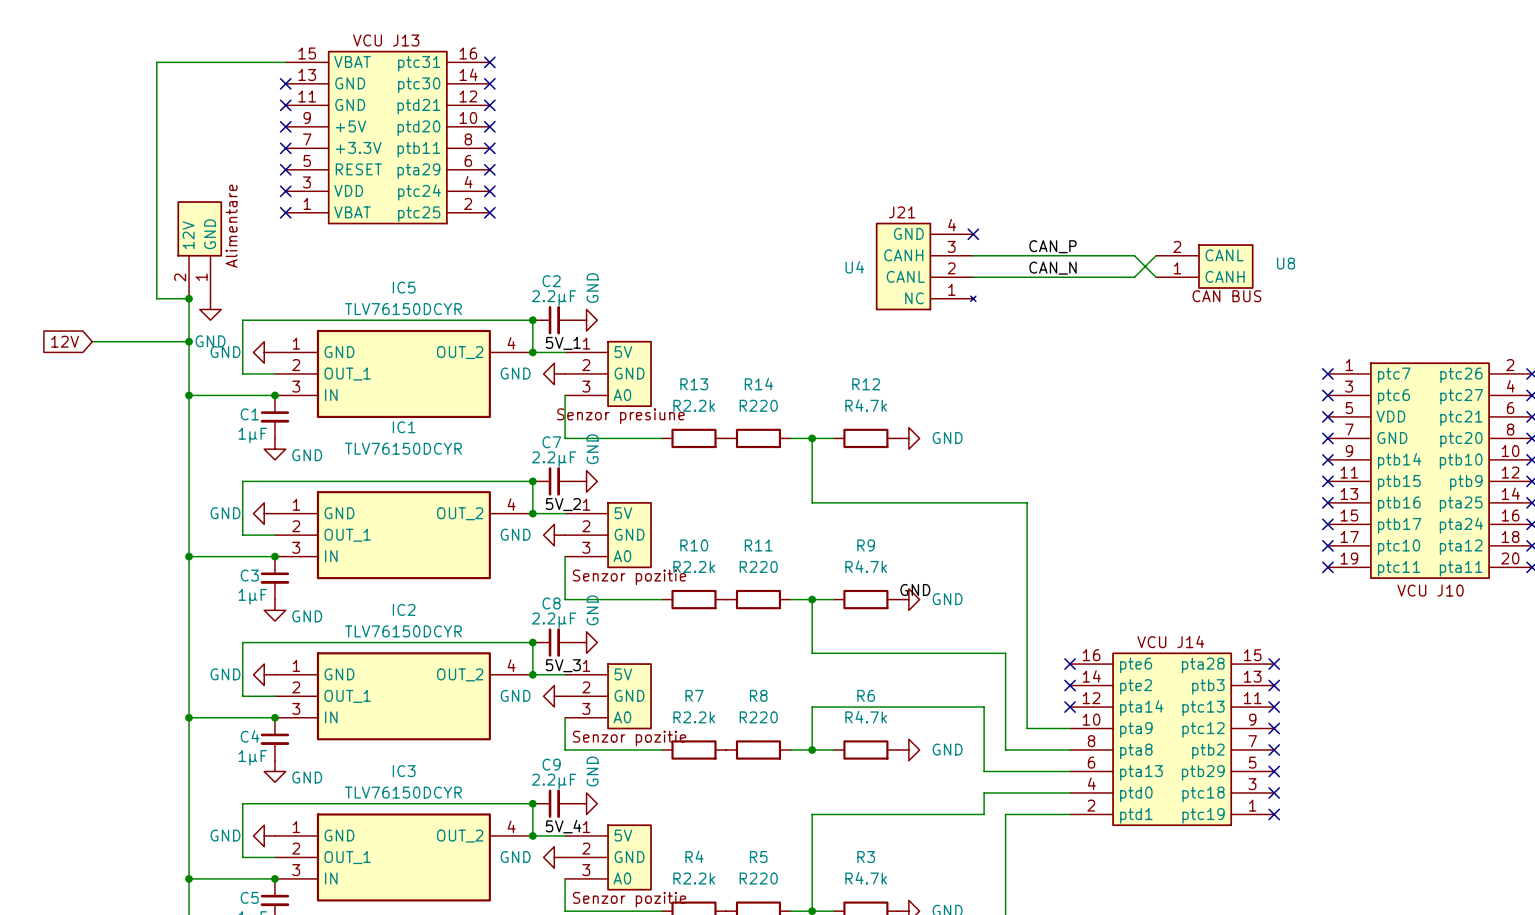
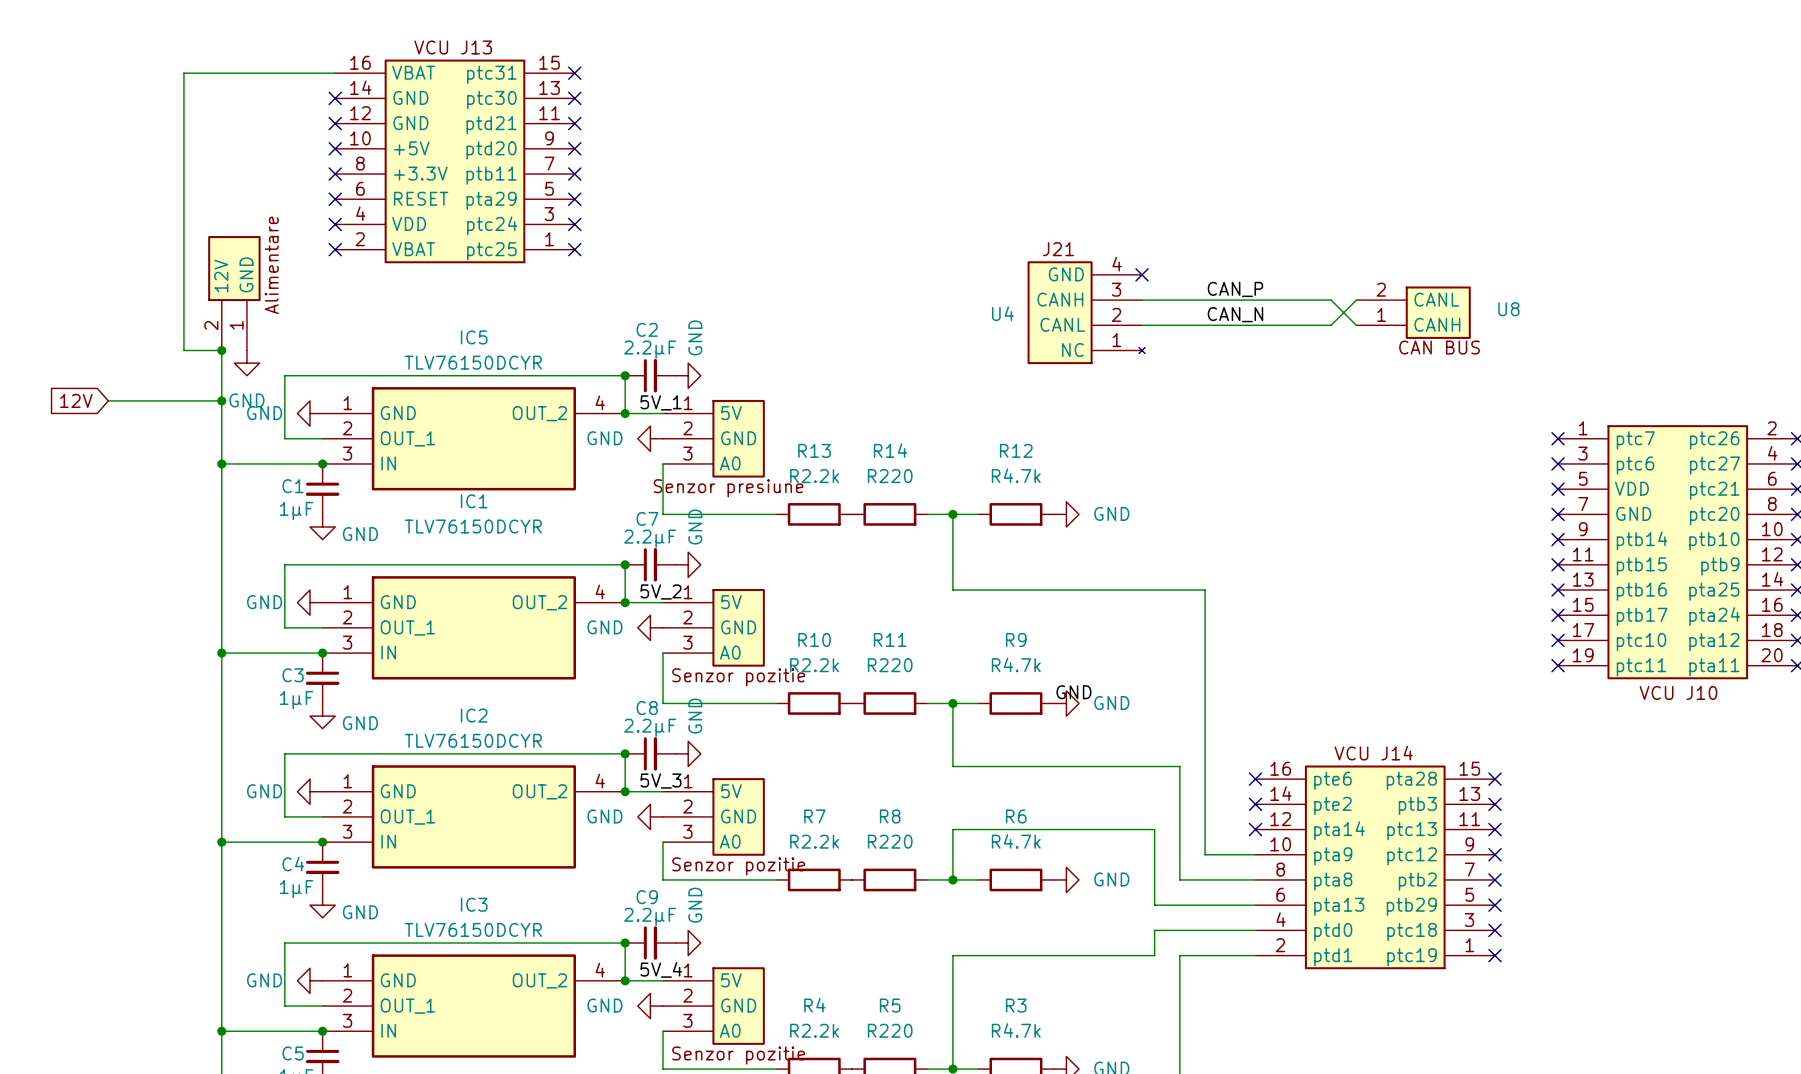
part symbol: [285, 50, 490, 225] -> [335, 59, 575, 264]

